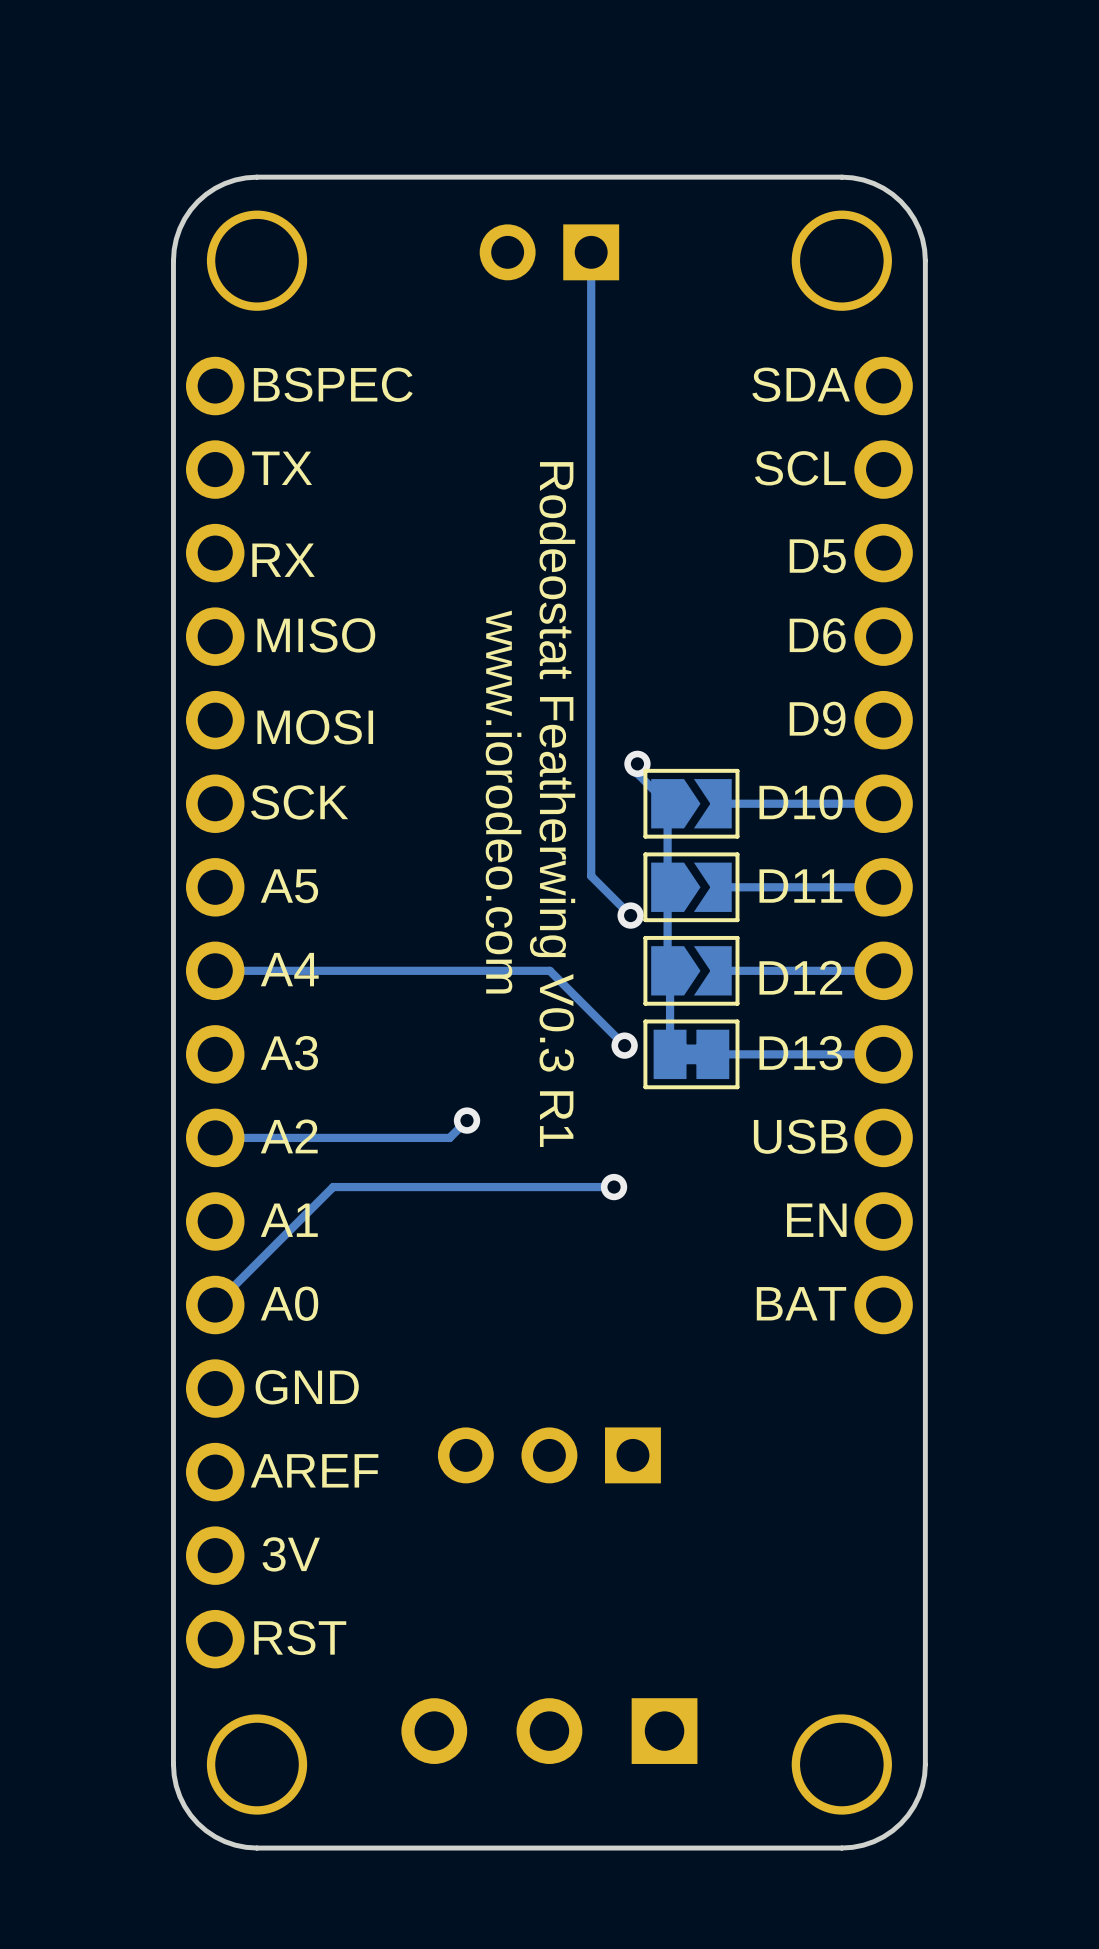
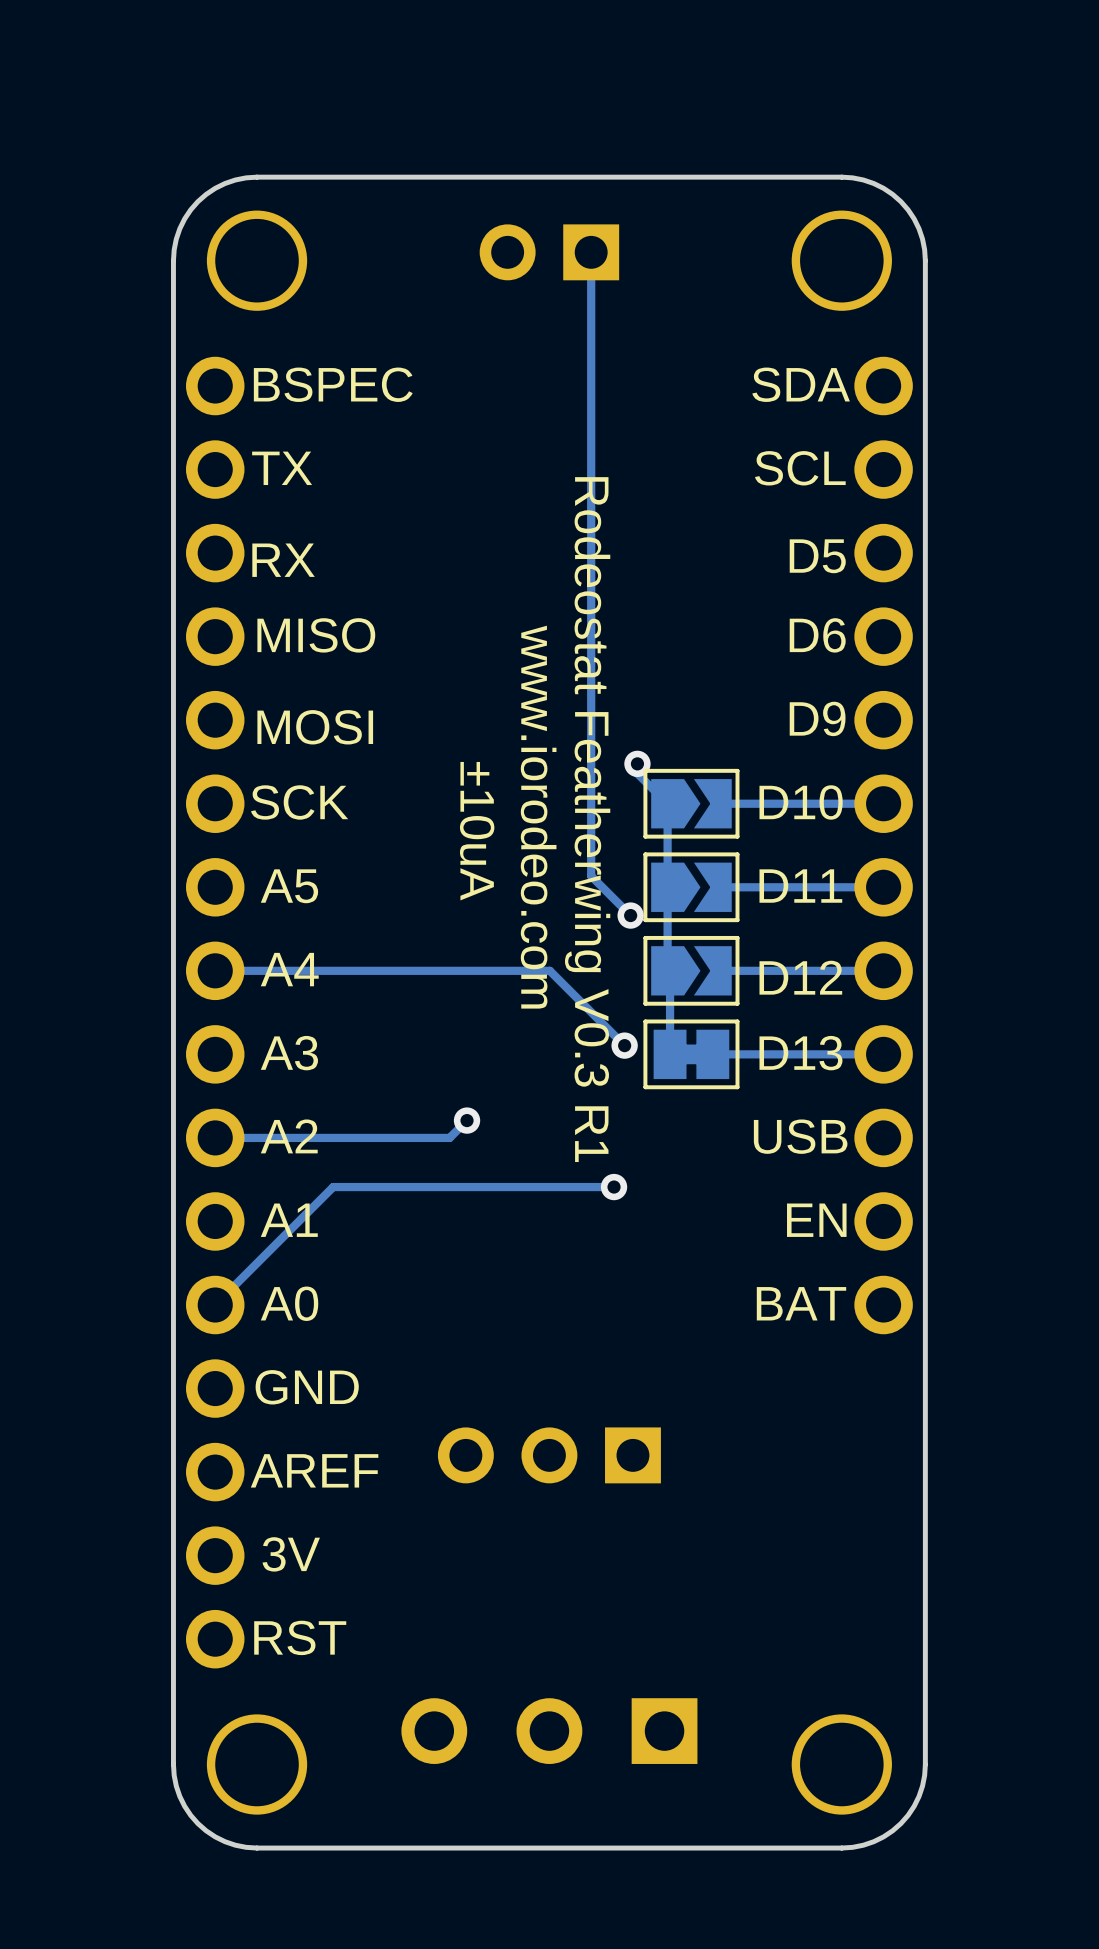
text position: www.iorodeo.com (503, 802) -> www.iorodeo.com (538, 817)
text position: Rodeostat Featherwing V0.3 R1 (552, 804) -> Rodeostat Featherwing V0.3 R1 (587, 819)
text: none -> ±10uA (477, 831)

